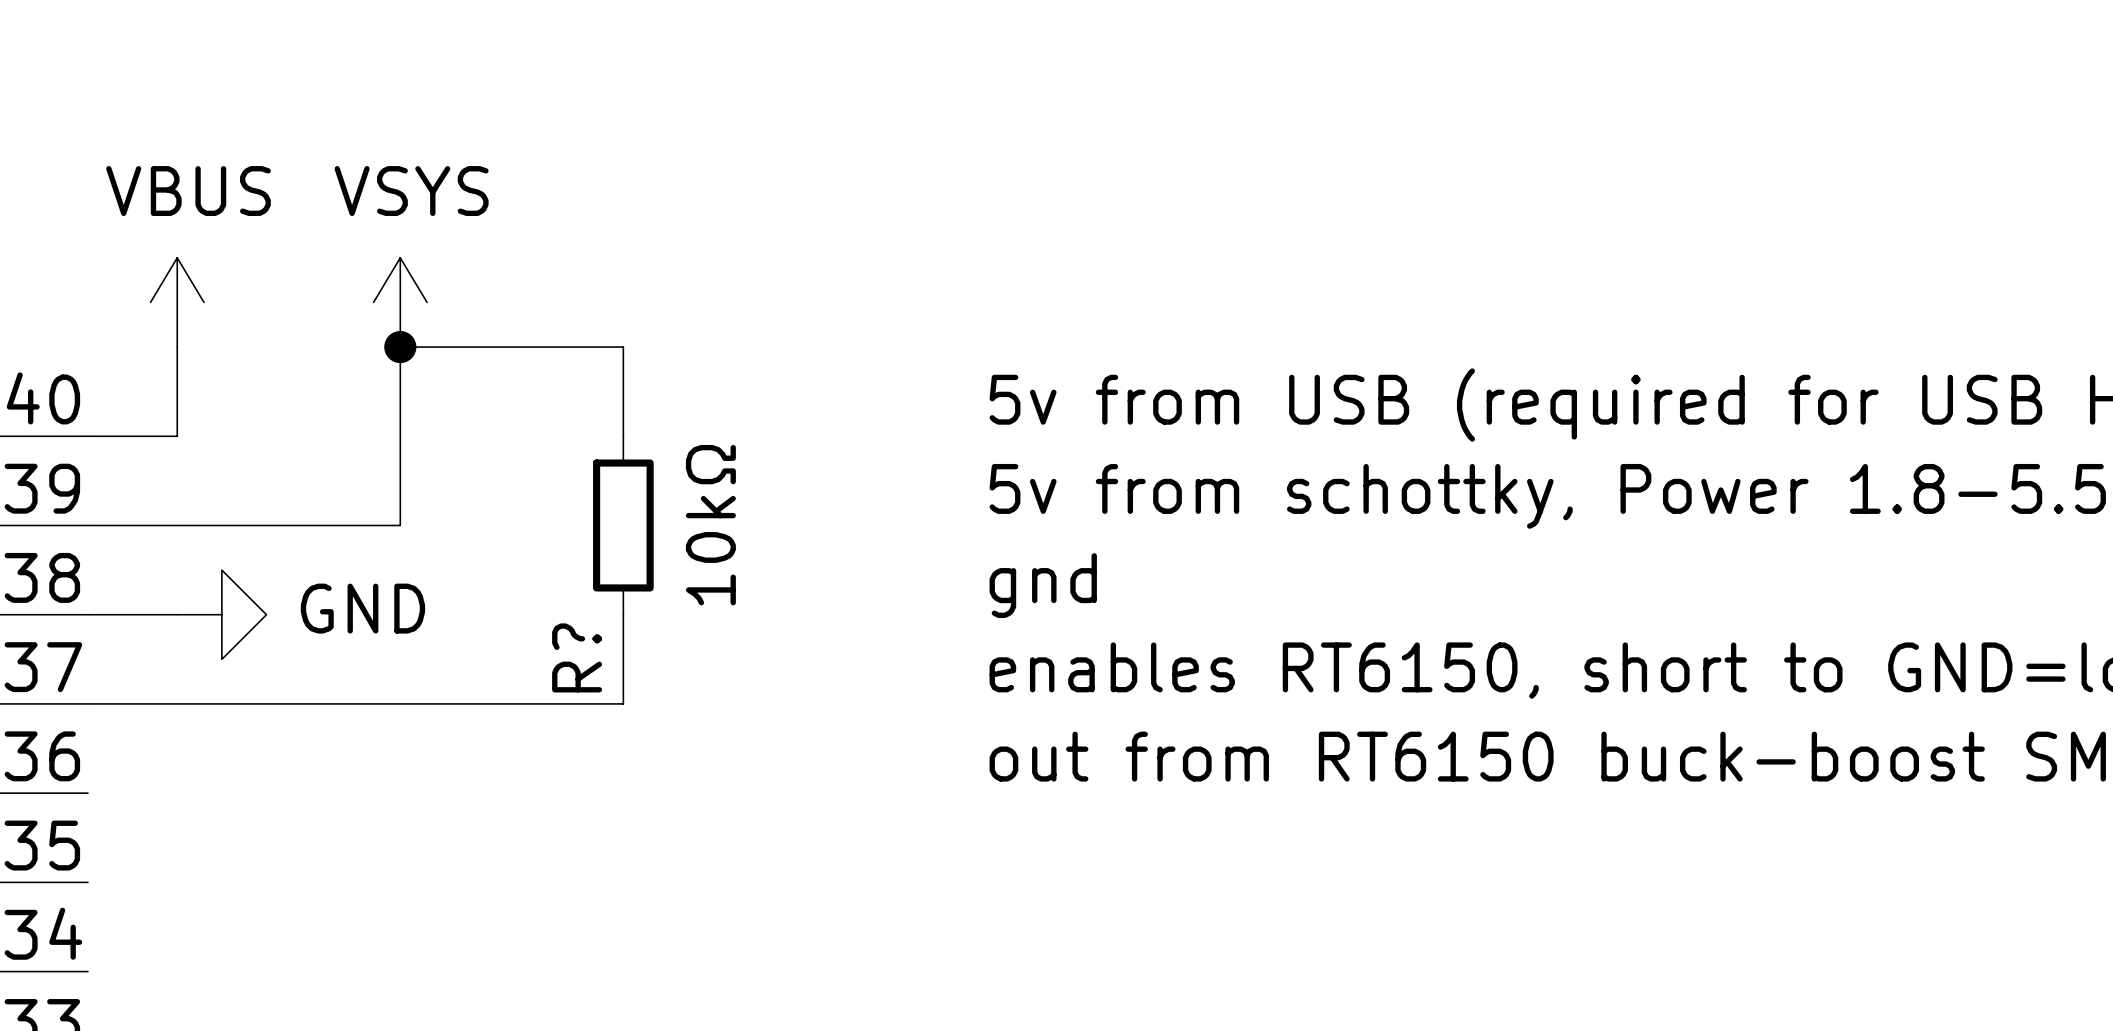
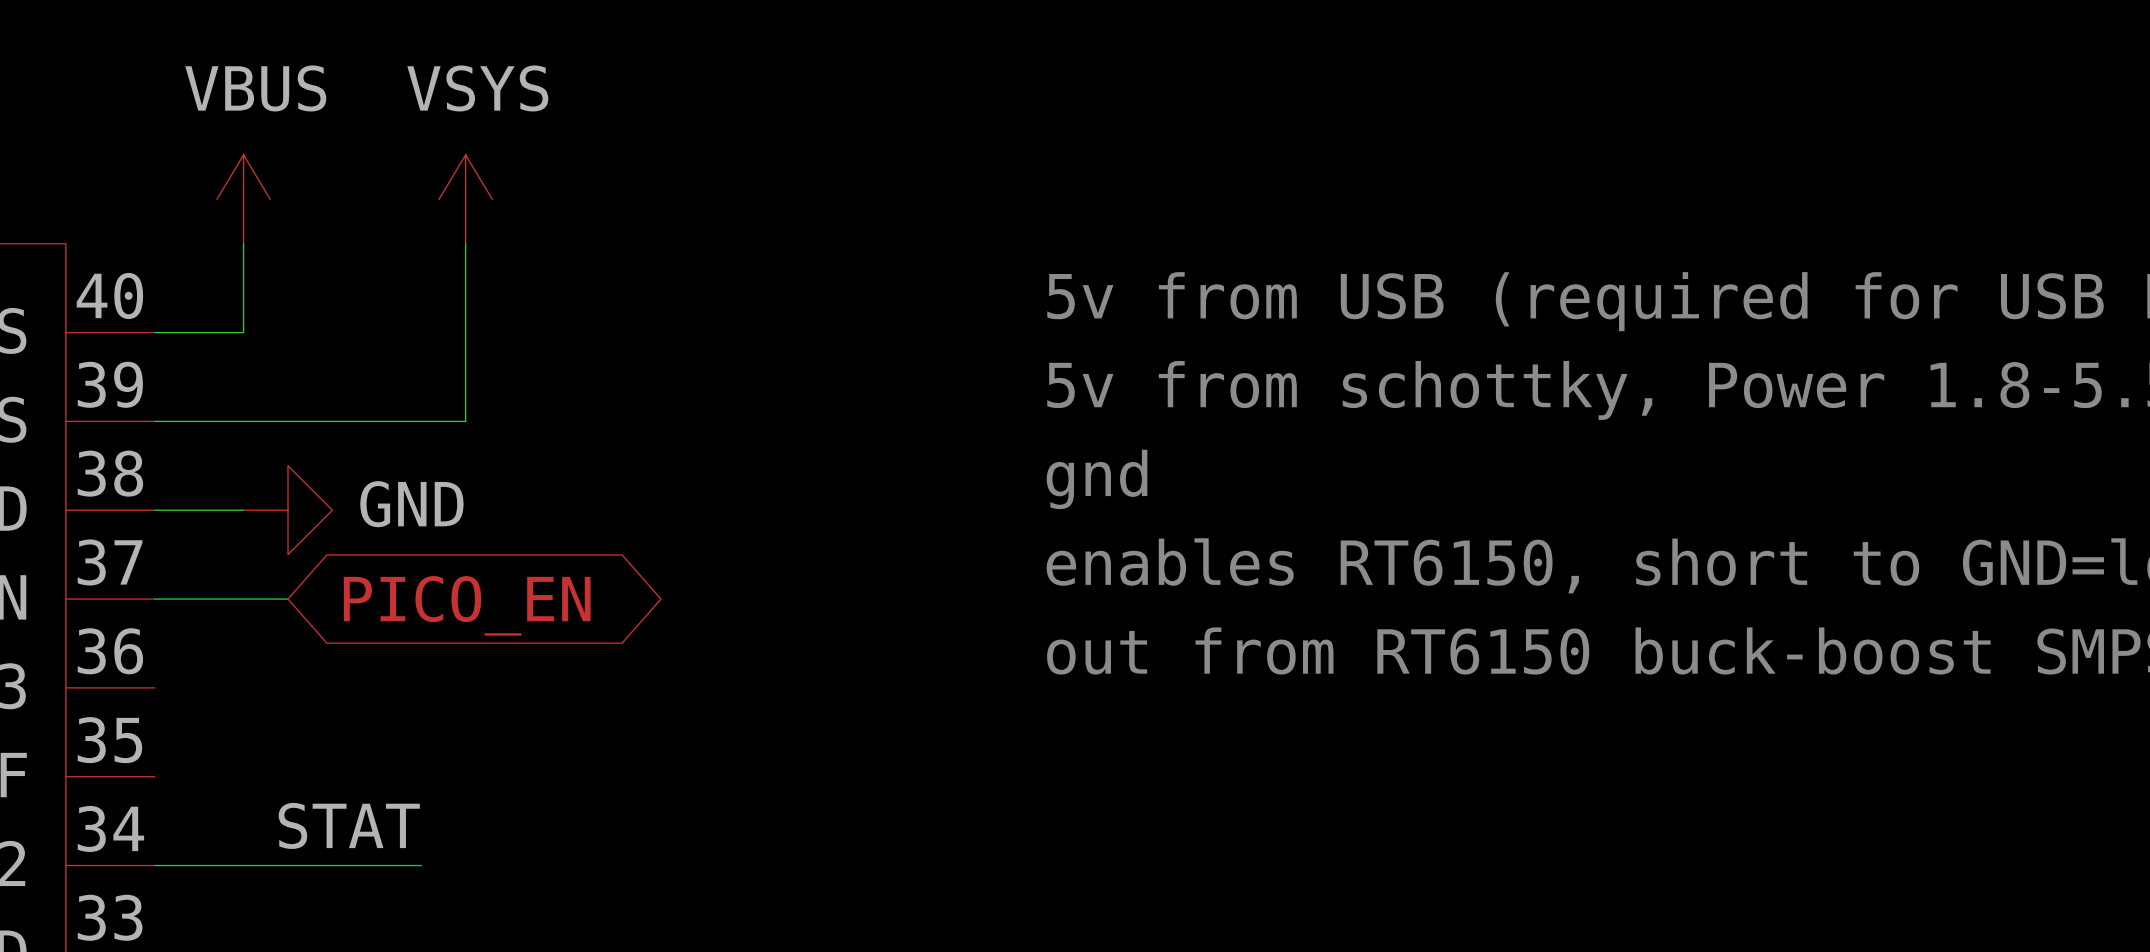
wire: (400, 347) (623, 347) (623, 436) -> none
junction: (400, 347) -> none
R?: 10kΩ (623, 525) -> none
wire: (623, 614) (623, 703) (221, 703) -> none
global label: none -> PICO_EN (467, 605)
label: none -> STAT (349, 825)
wire: none -> (154, 865) (421, 865)

